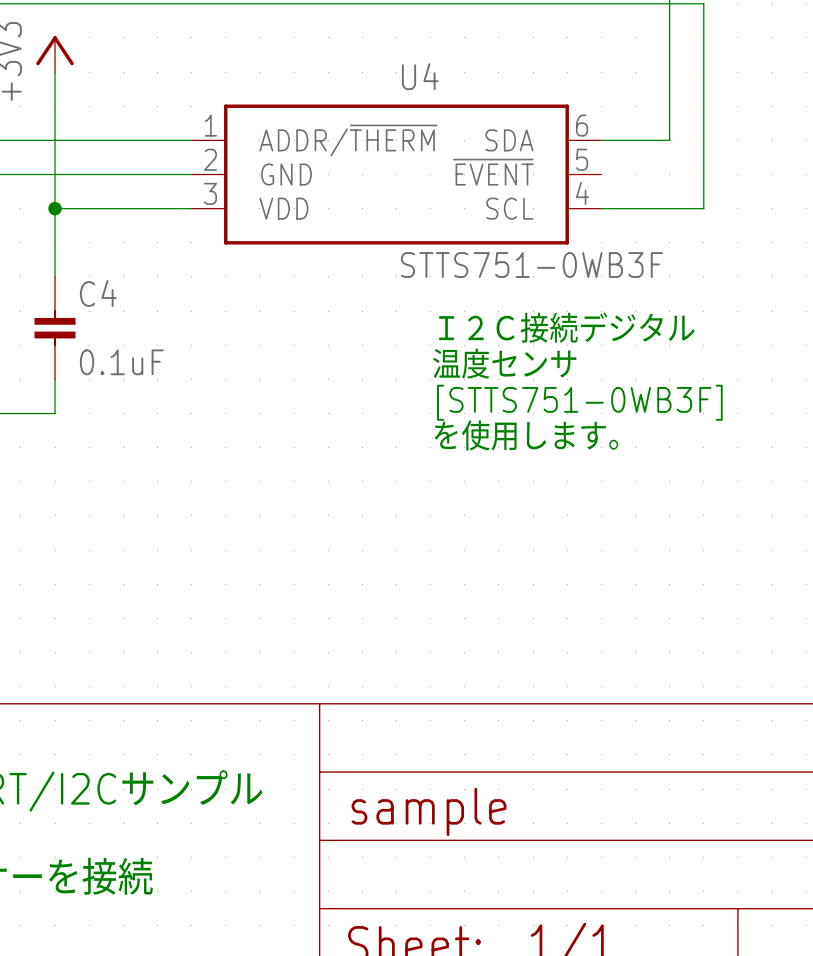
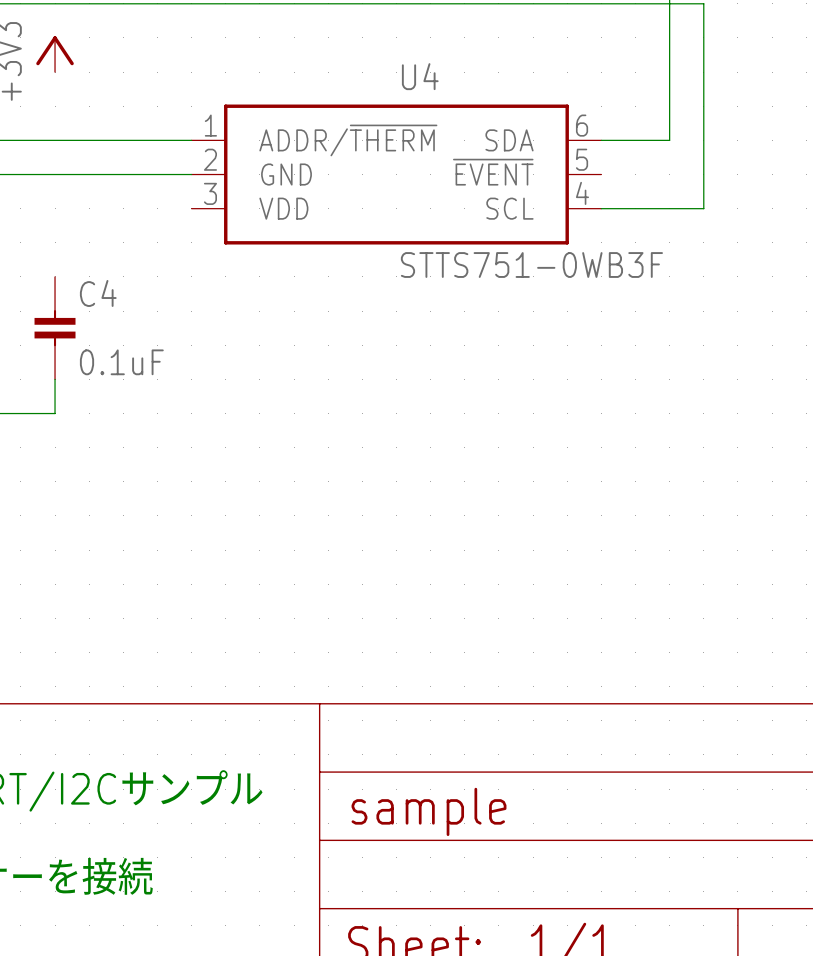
wire: (55, 72) (55, 276) -> none
wire: (55, 208) (191, 208) -> none
junction: (55, 208) -> none
text: Ｉ２Ｃ接続デジタル (566, 327) -> none
text: 温度センサ (504, 363) -> none
text: [STTS751-0WB3F] (579, 402) -> none
text: を使用します。 (526, 435) -> none

